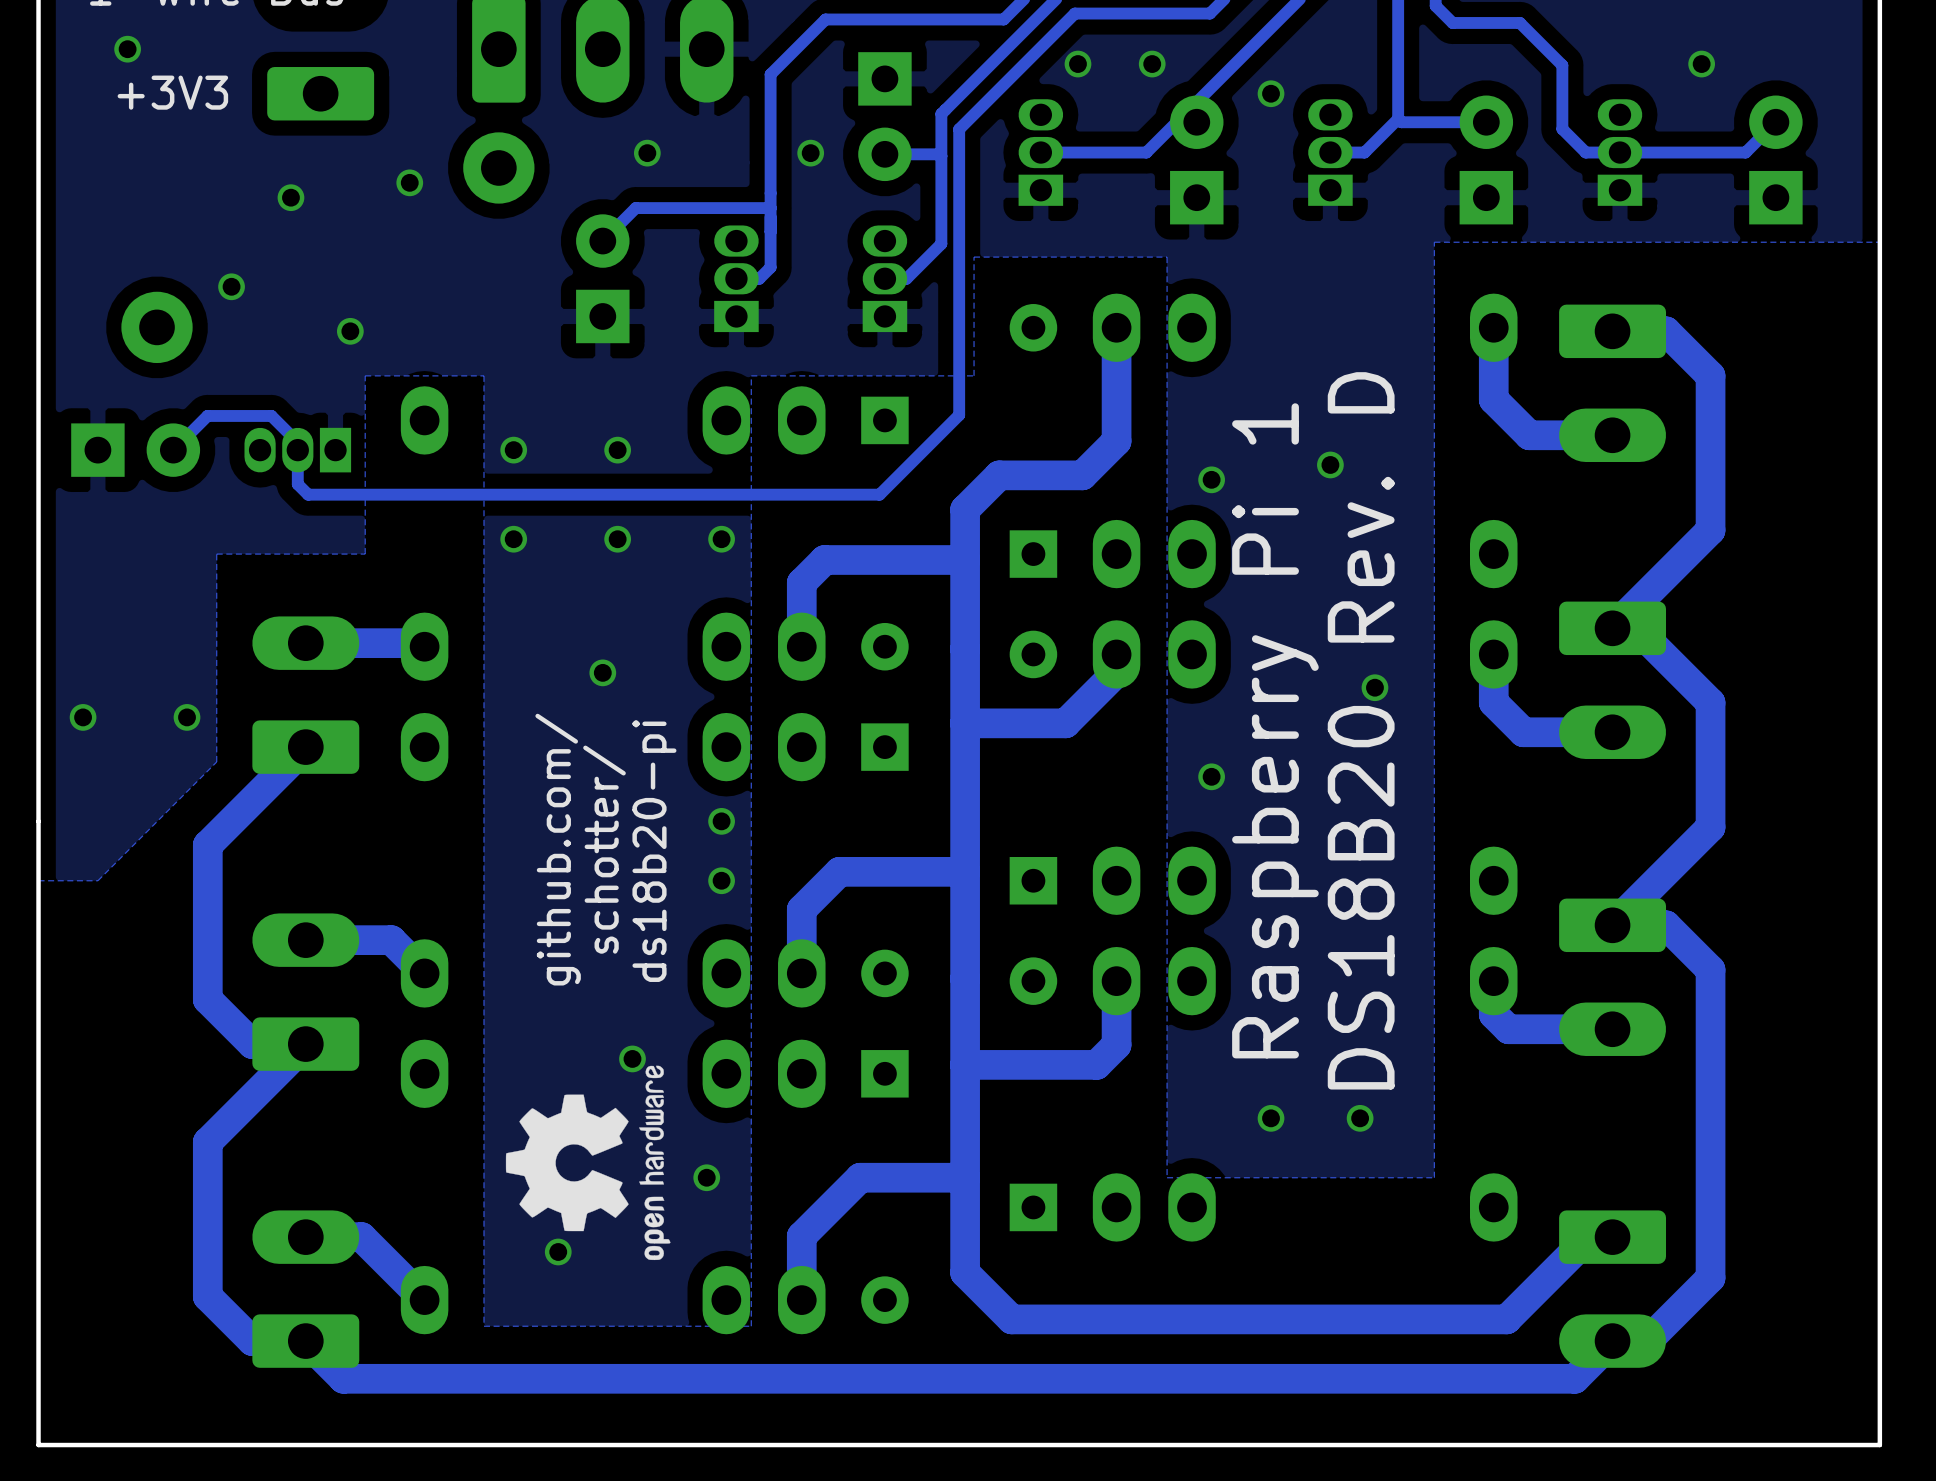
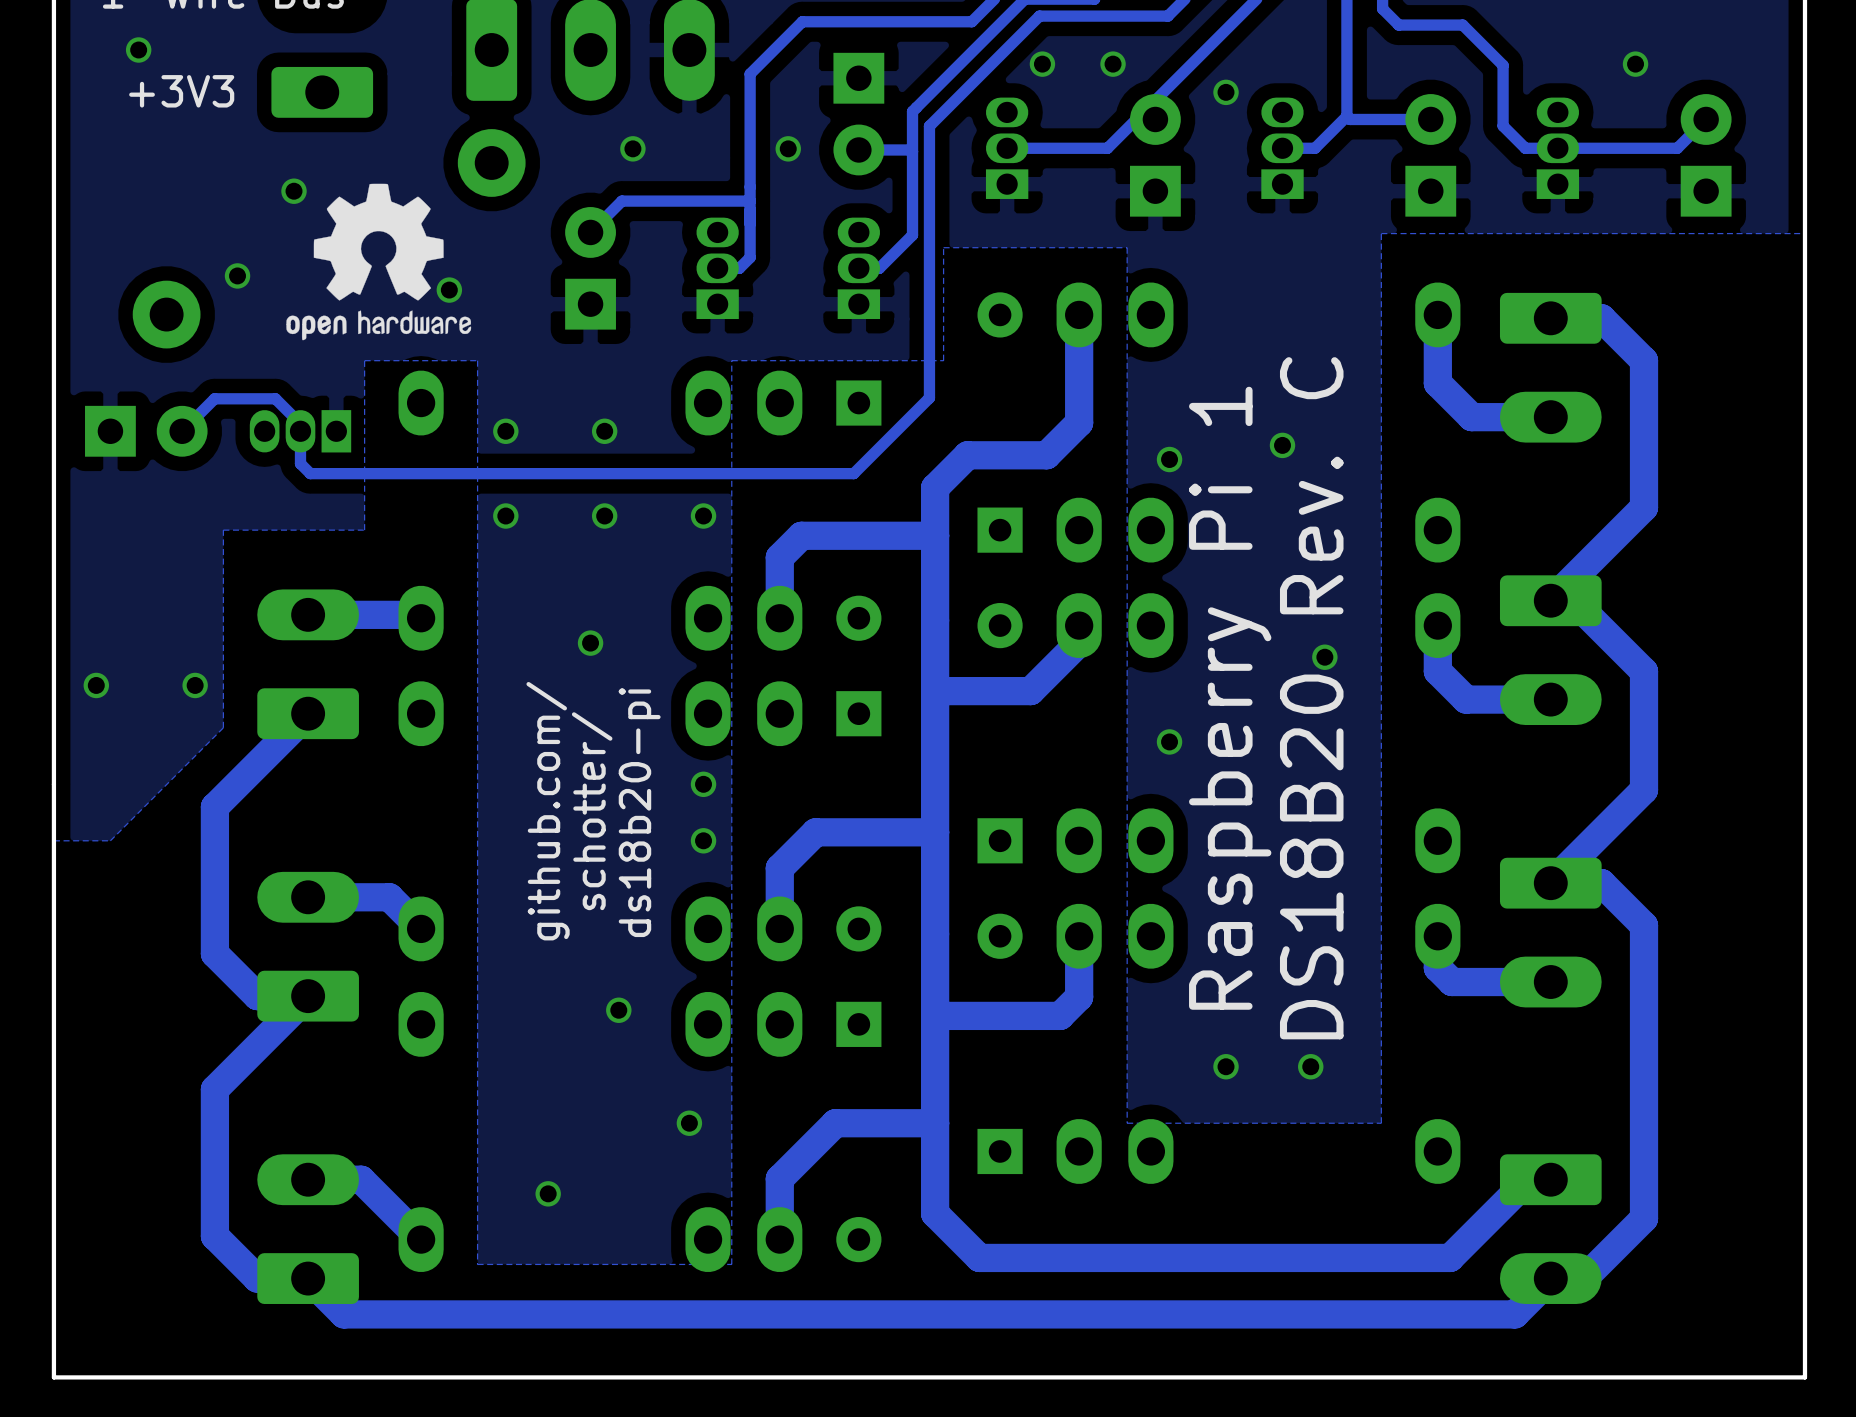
via: (409, 182) -> none
drawing: none -> [286, 183, 472, 341]
via: none -> (449, 290)
via: (350, 331) -> none
text: DS18B20 Rev. D (1361, 730) -> DS18B20 Rev. C (1311, 698)
drawing: [505, 1065, 671, 1261] -> none

